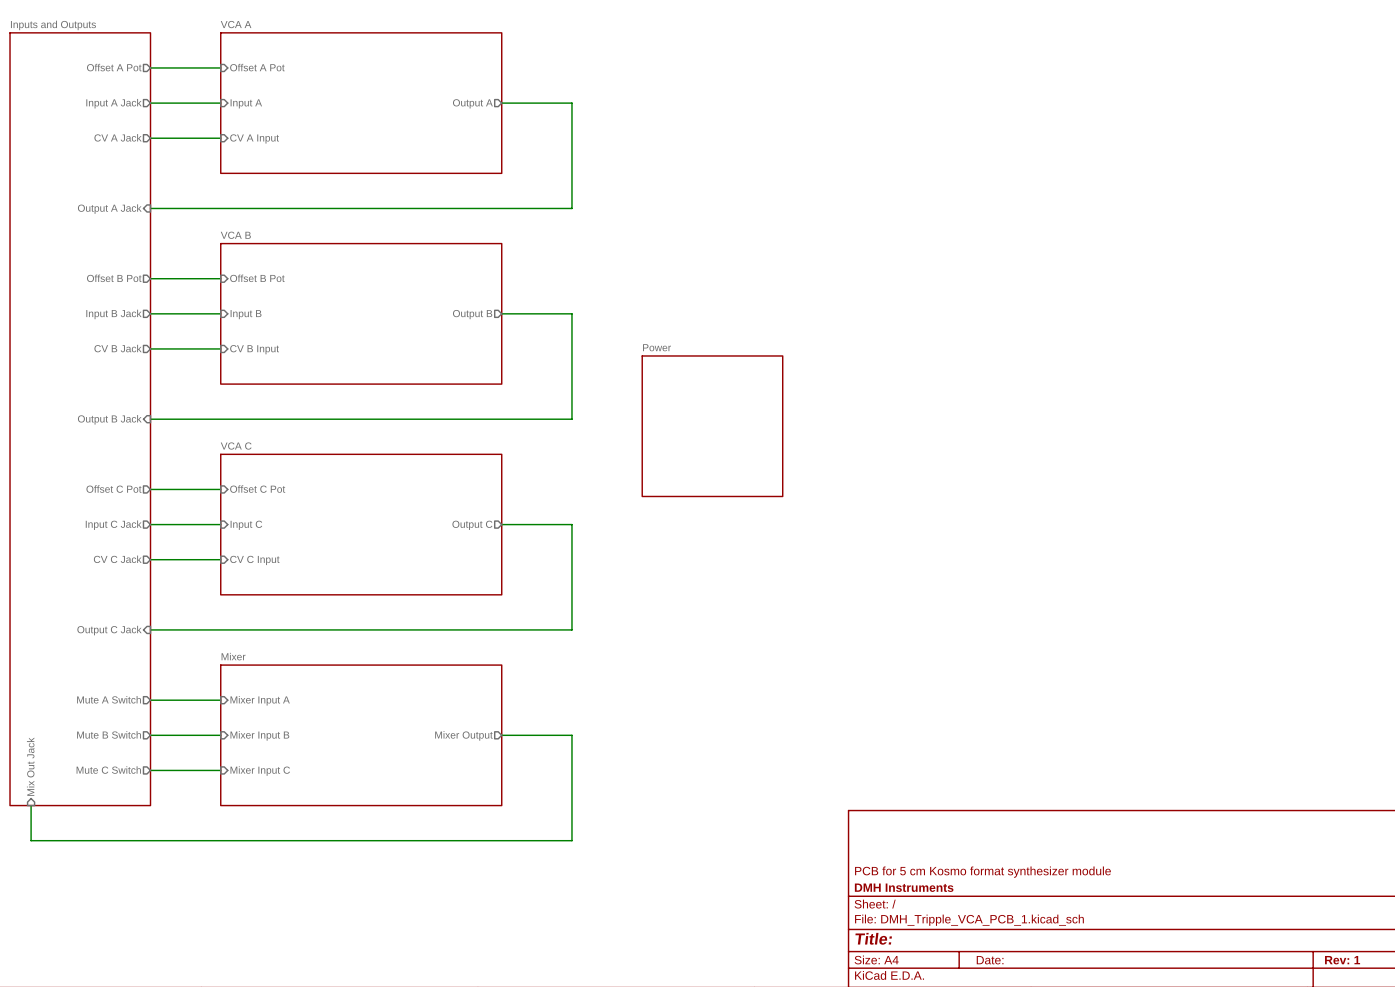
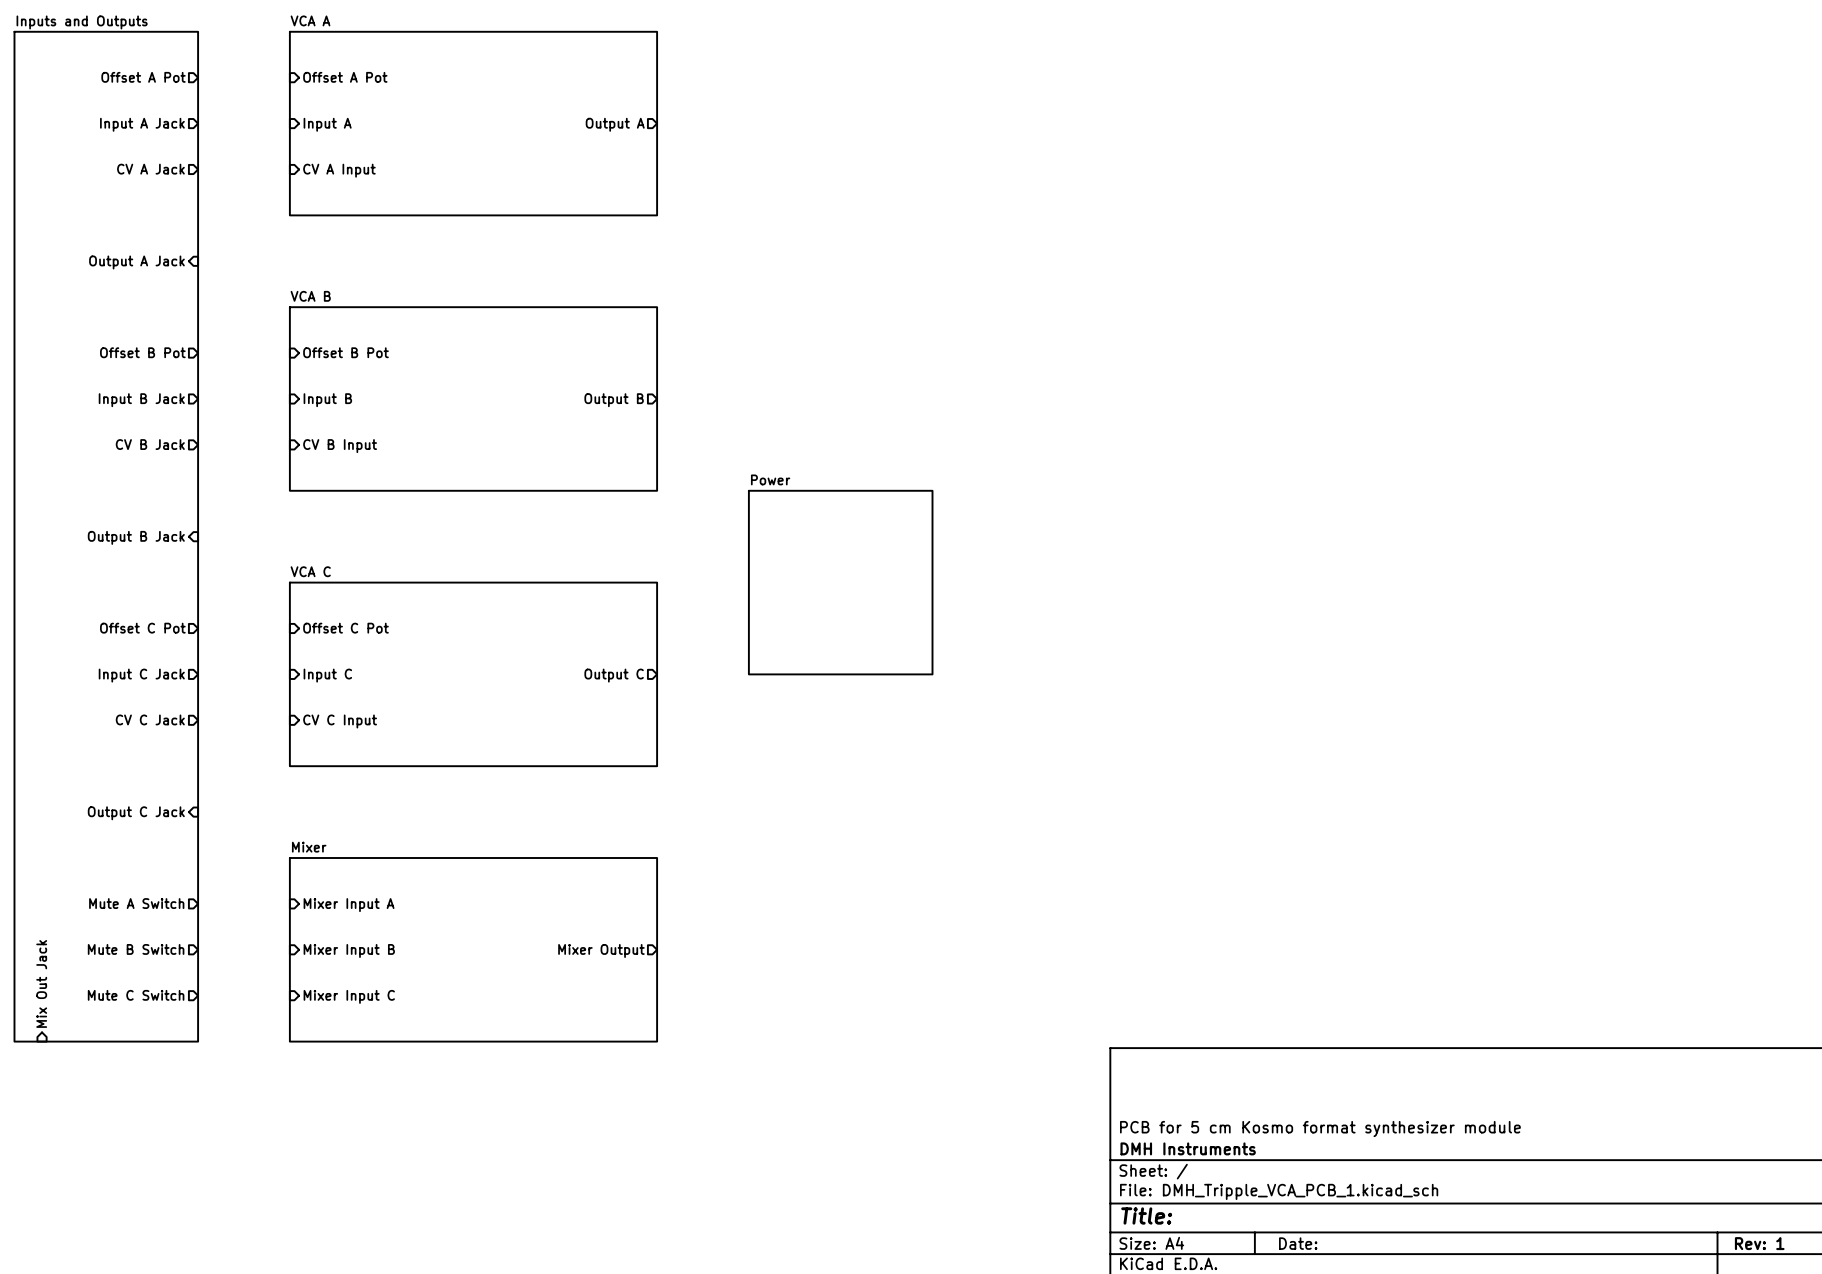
wire: (150, 67) (220, 67) -> none
wire: (150, 103) (220, 103) -> none
wire: (501, 103) (571, 103) (571, 208) (150, 208) -> none
wire: (150, 138) (220, 138) -> none
wire: (150, 278) (220, 278) -> none
wire: (150, 313) (220, 313) -> none
wire: (501, 313) (571, 313) (571, 419) (150, 419) -> none
wire: (150, 348) (220, 348) -> none
sheet Power position: (712, 426) -> (840, 582)
wire: (150, 489) (220, 489) -> none
wire: (150, 524) (220, 524) -> none
wire: (501, 524) (571, 524) (571, 629) (150, 629) -> none
wire: (150, 559) (220, 559) -> none
wire: (150, 700) (220, 700) -> none
wire: (150, 735) (220, 735) -> none
wire: (501, 735) (571, 735) (571, 840) (31, 840) (31, 805) -> none
wire: (150, 770) (220, 770) -> none

